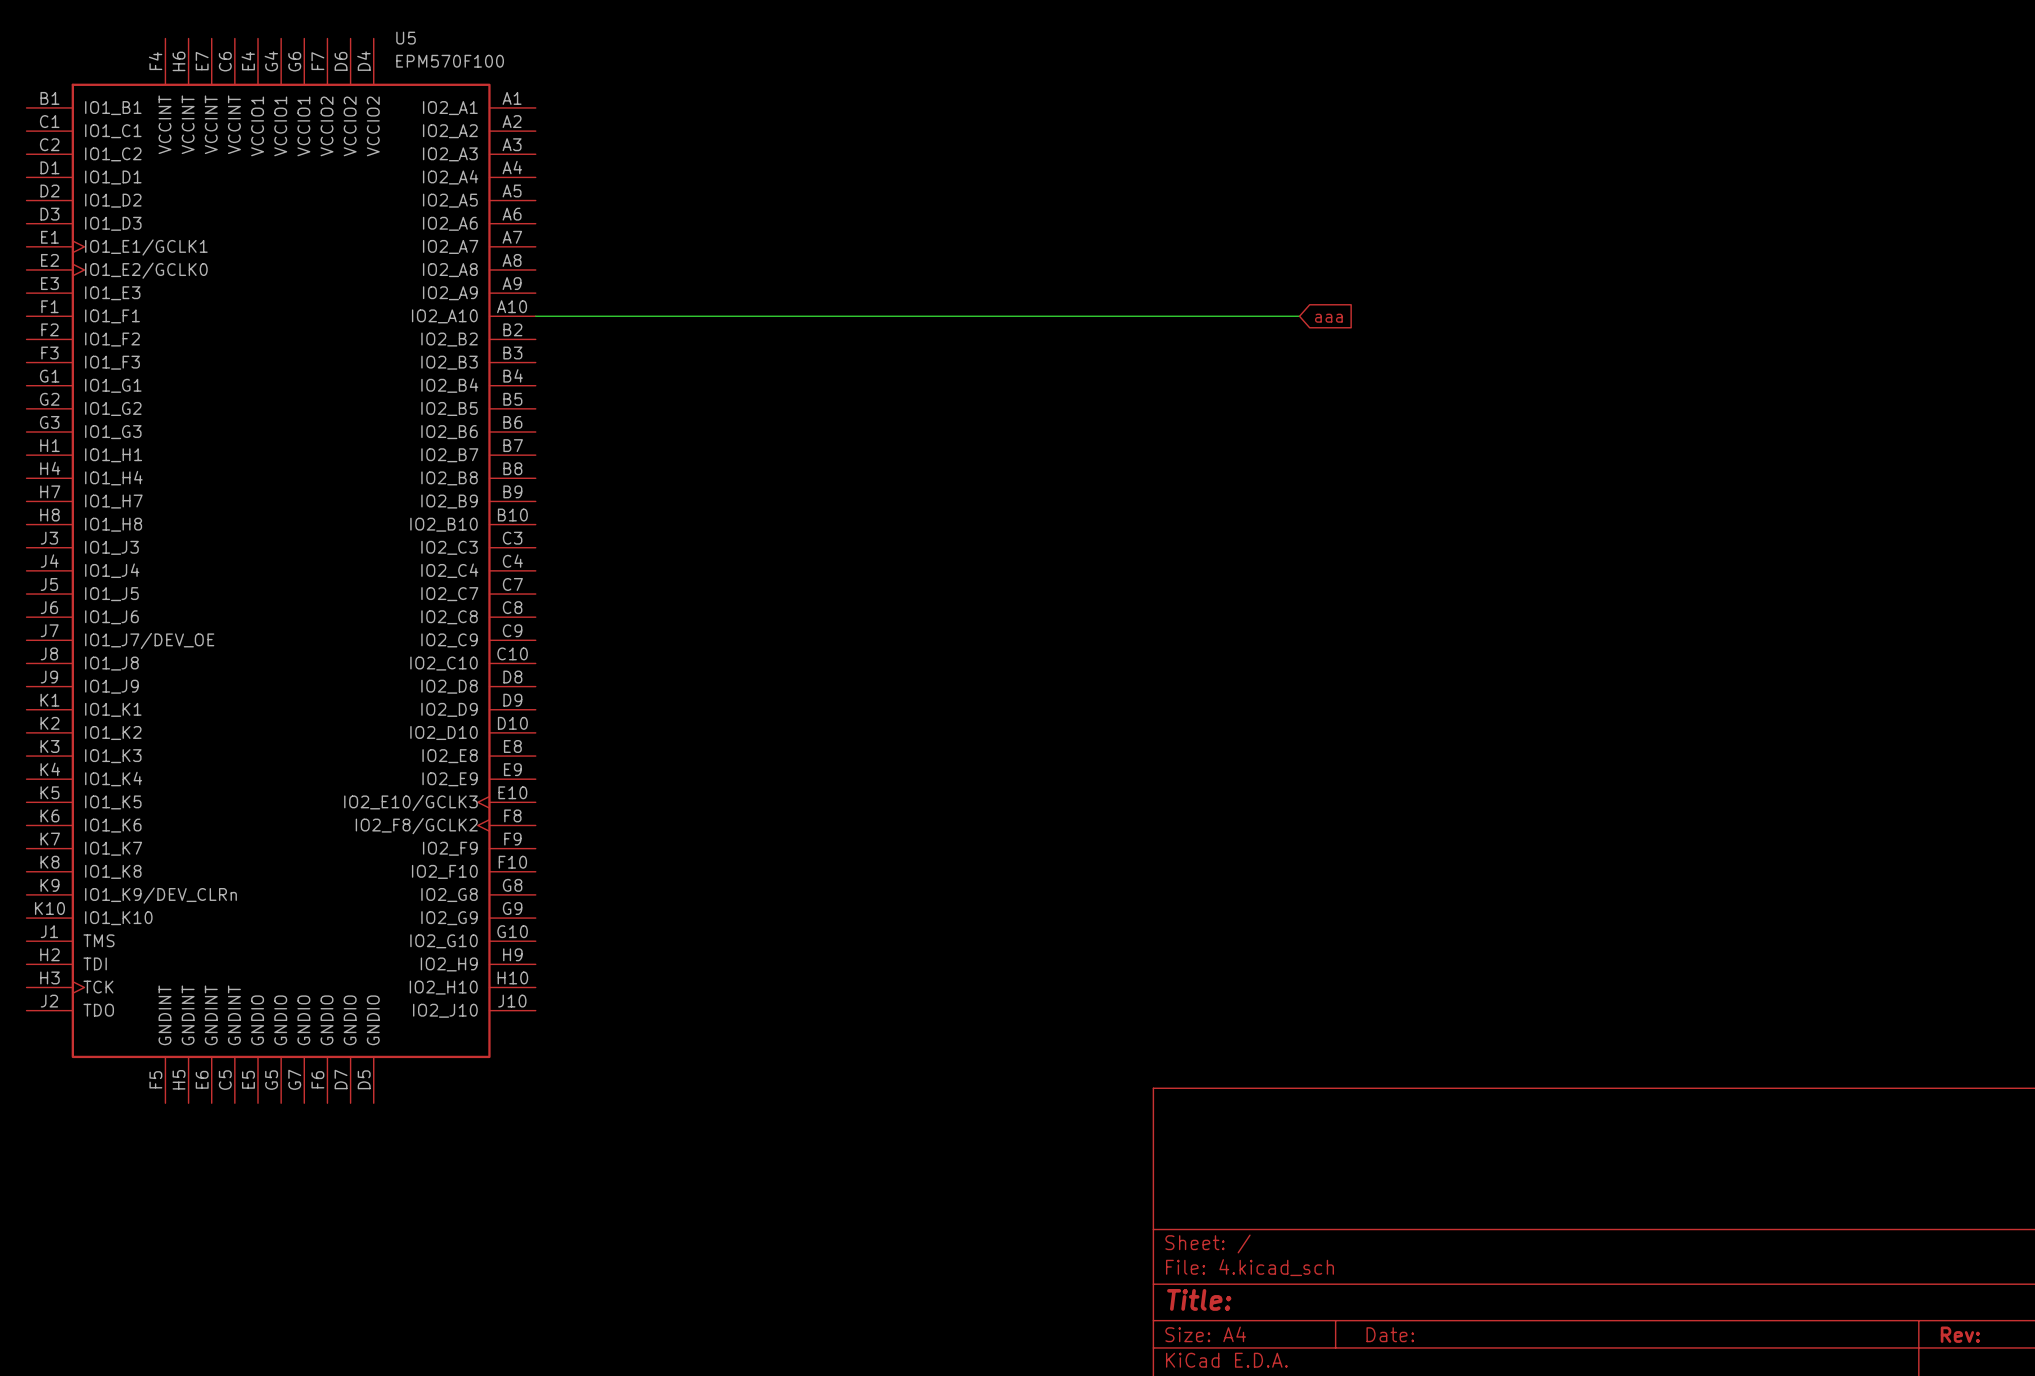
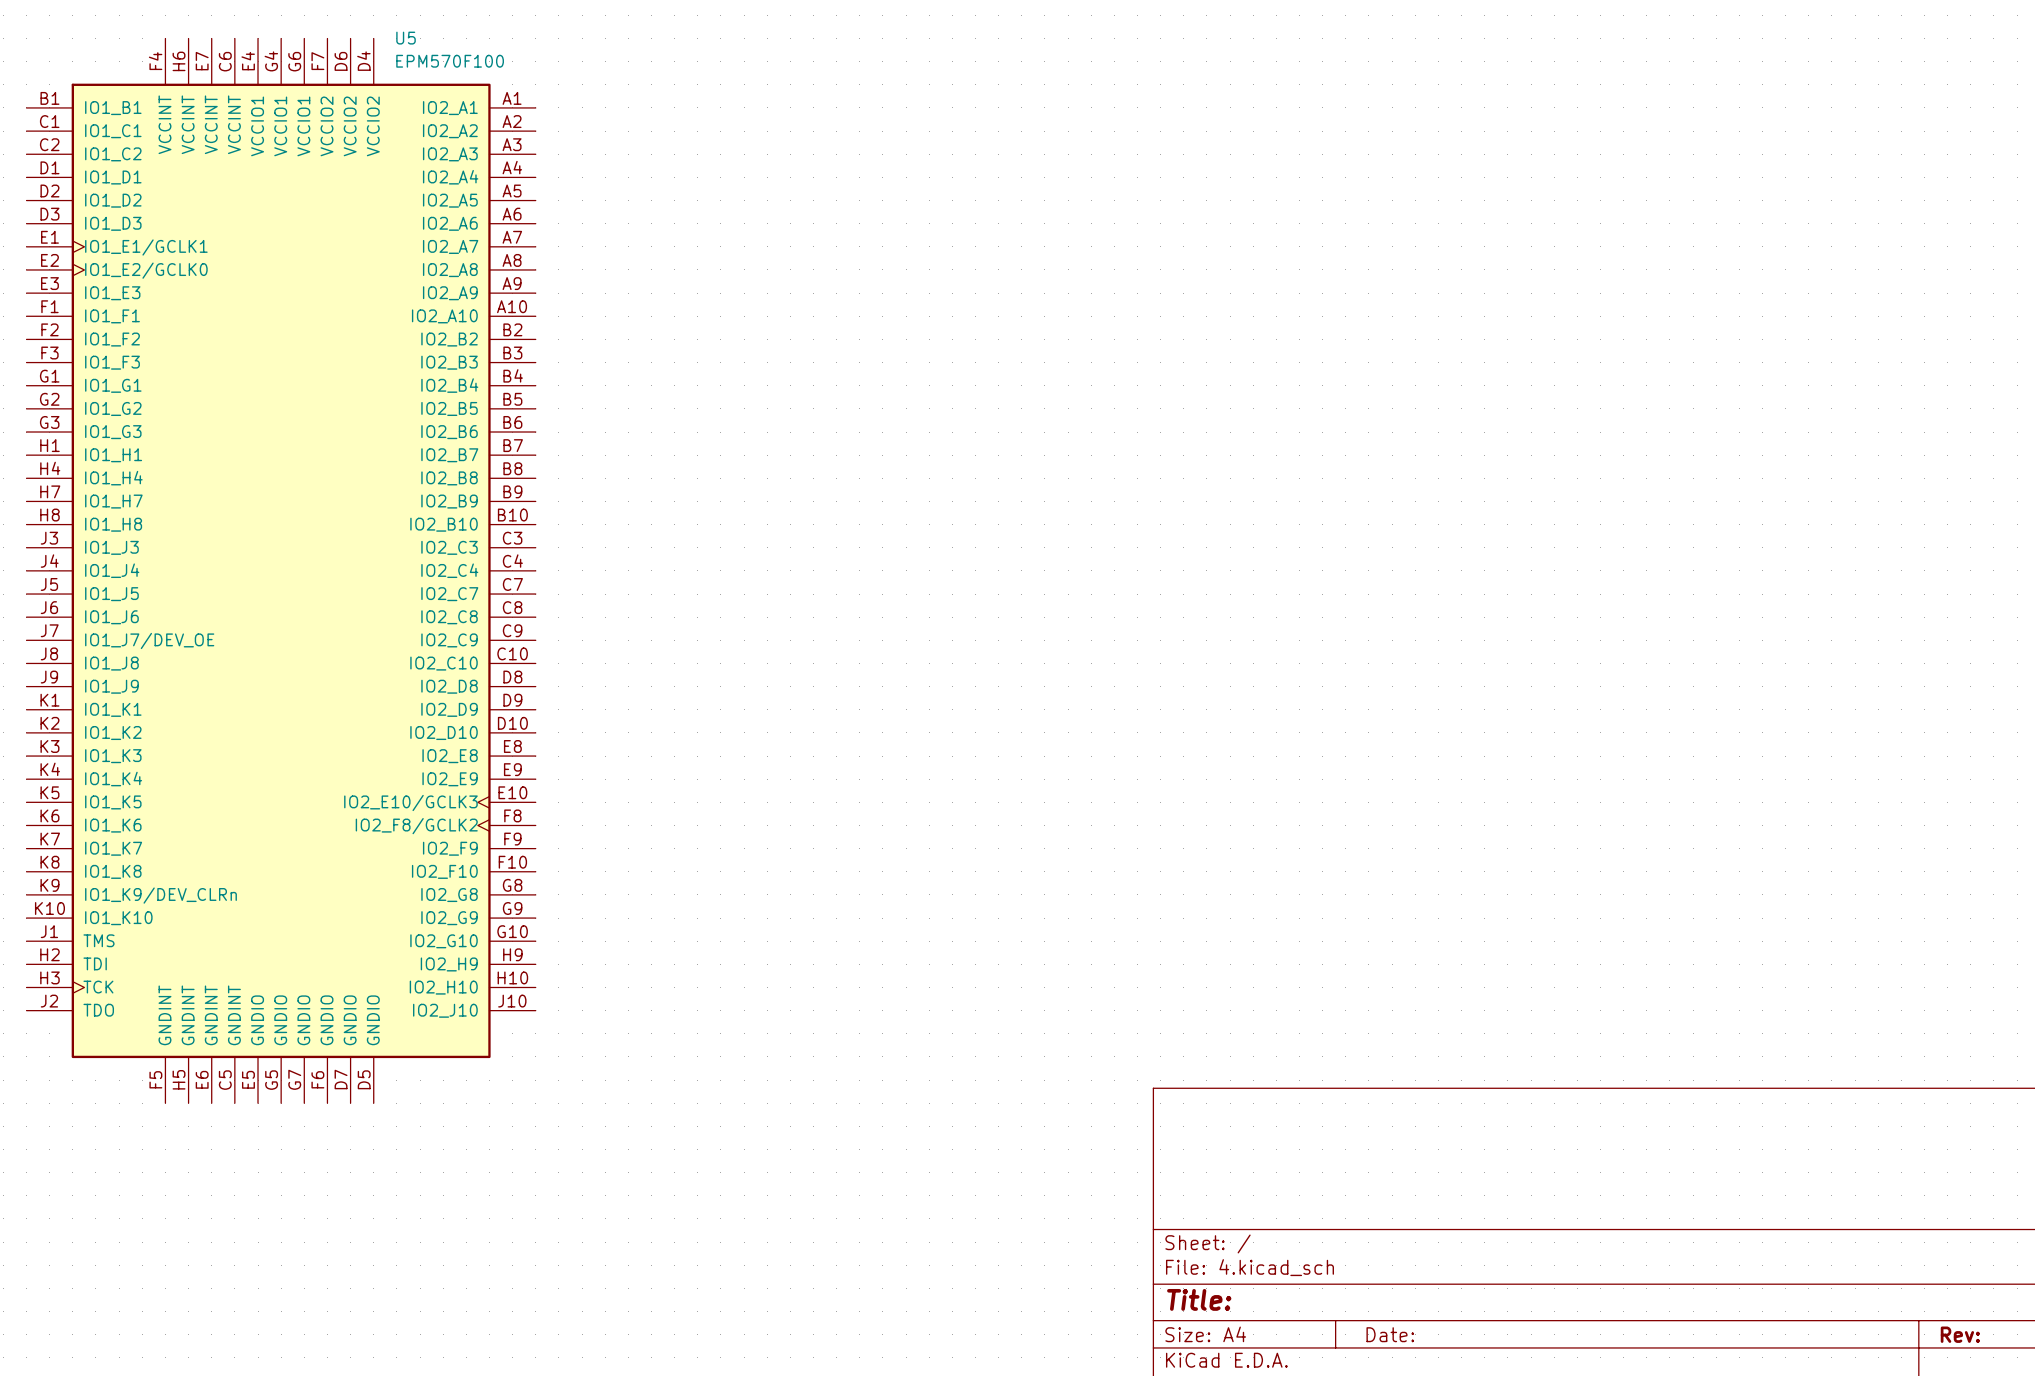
wire: (535, 316) (1299, 316) -> none
global label: aaa (1328, 318) -> none

